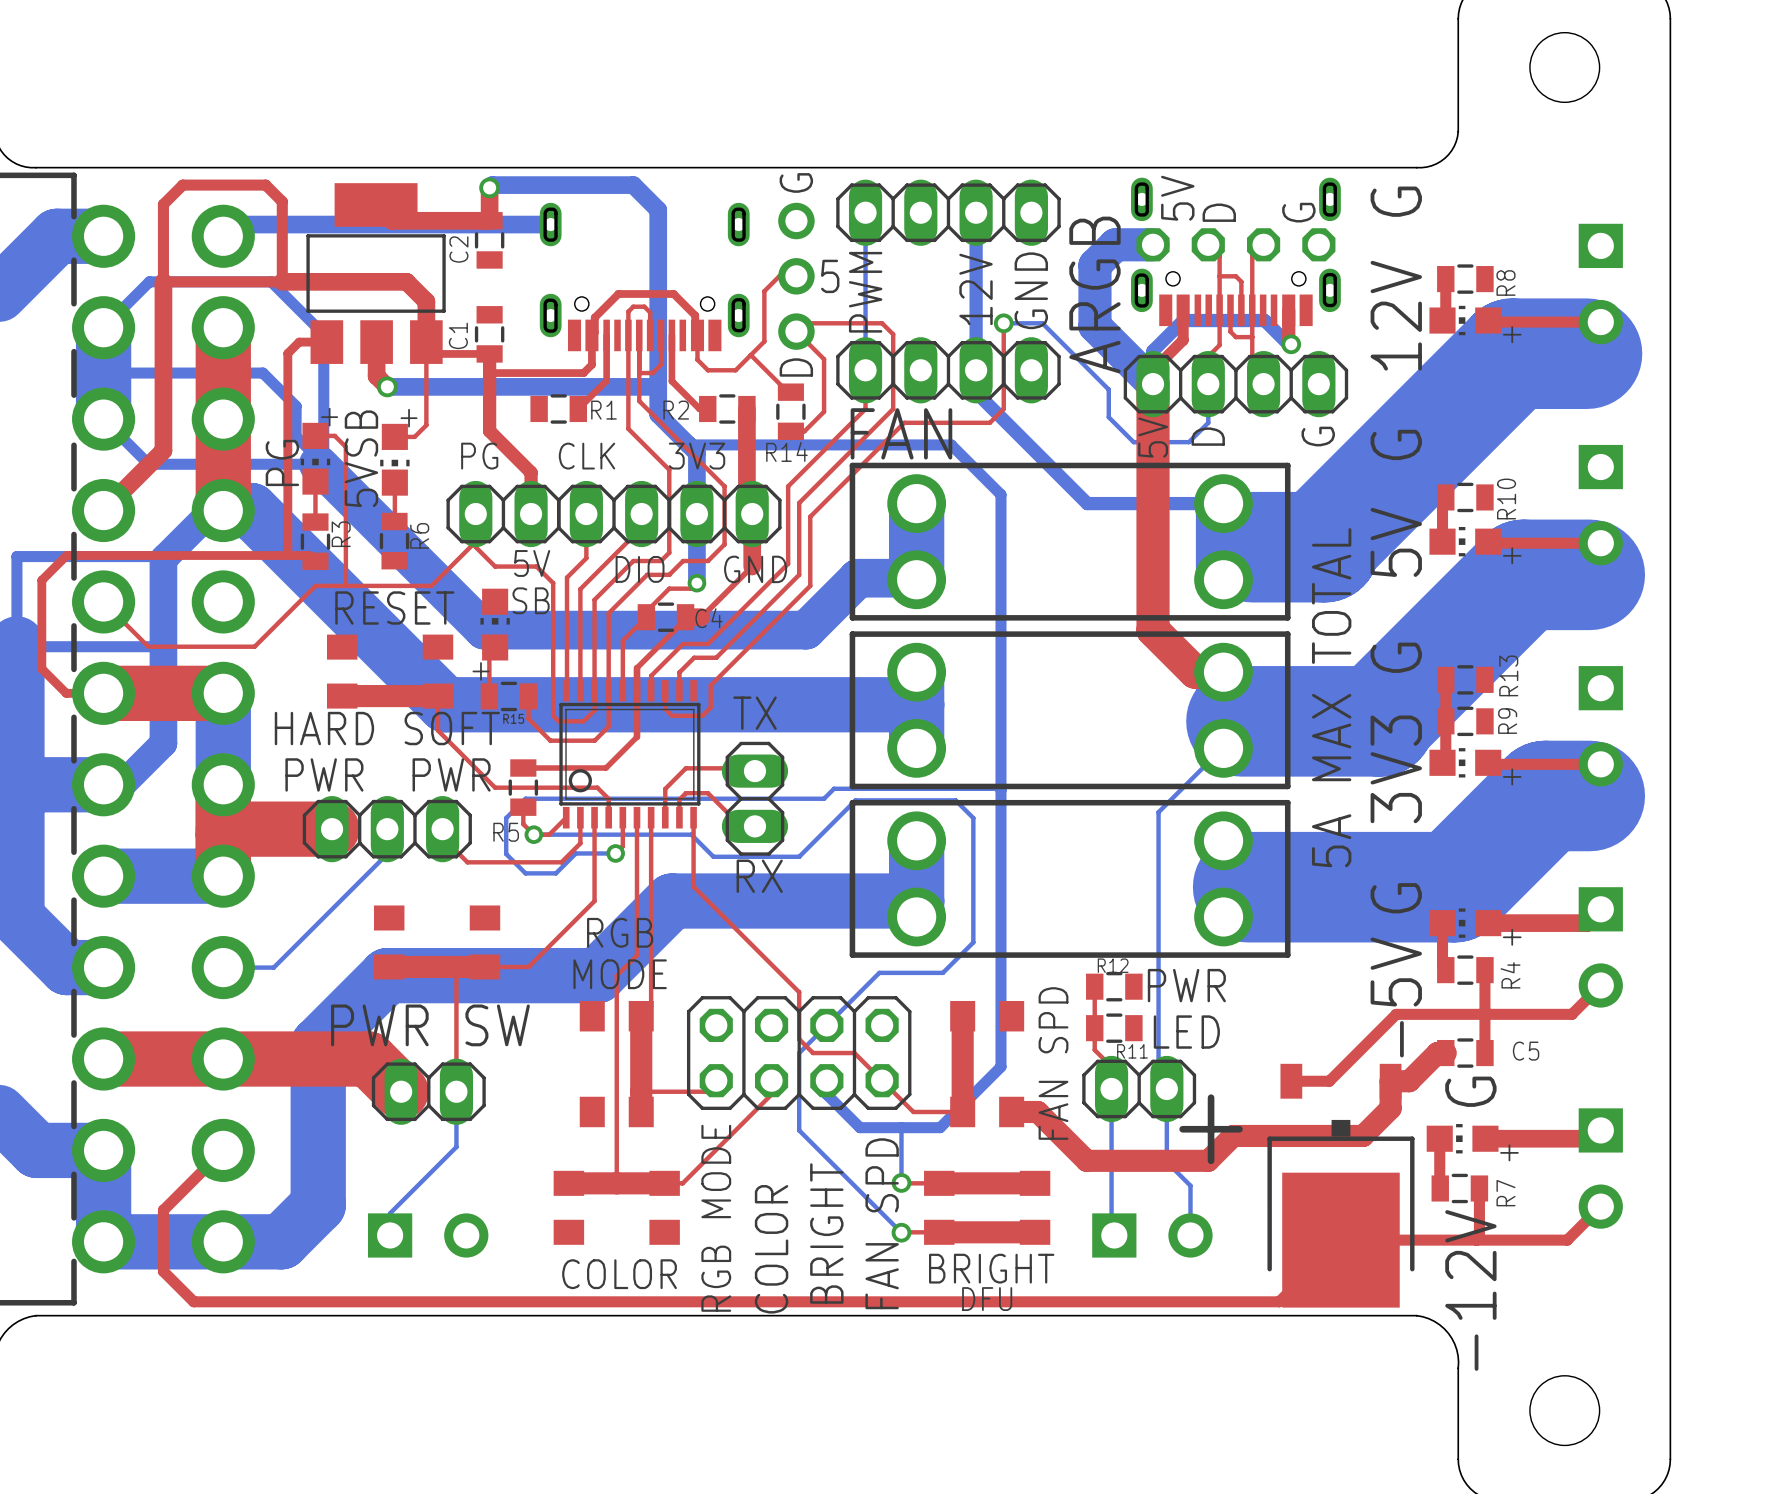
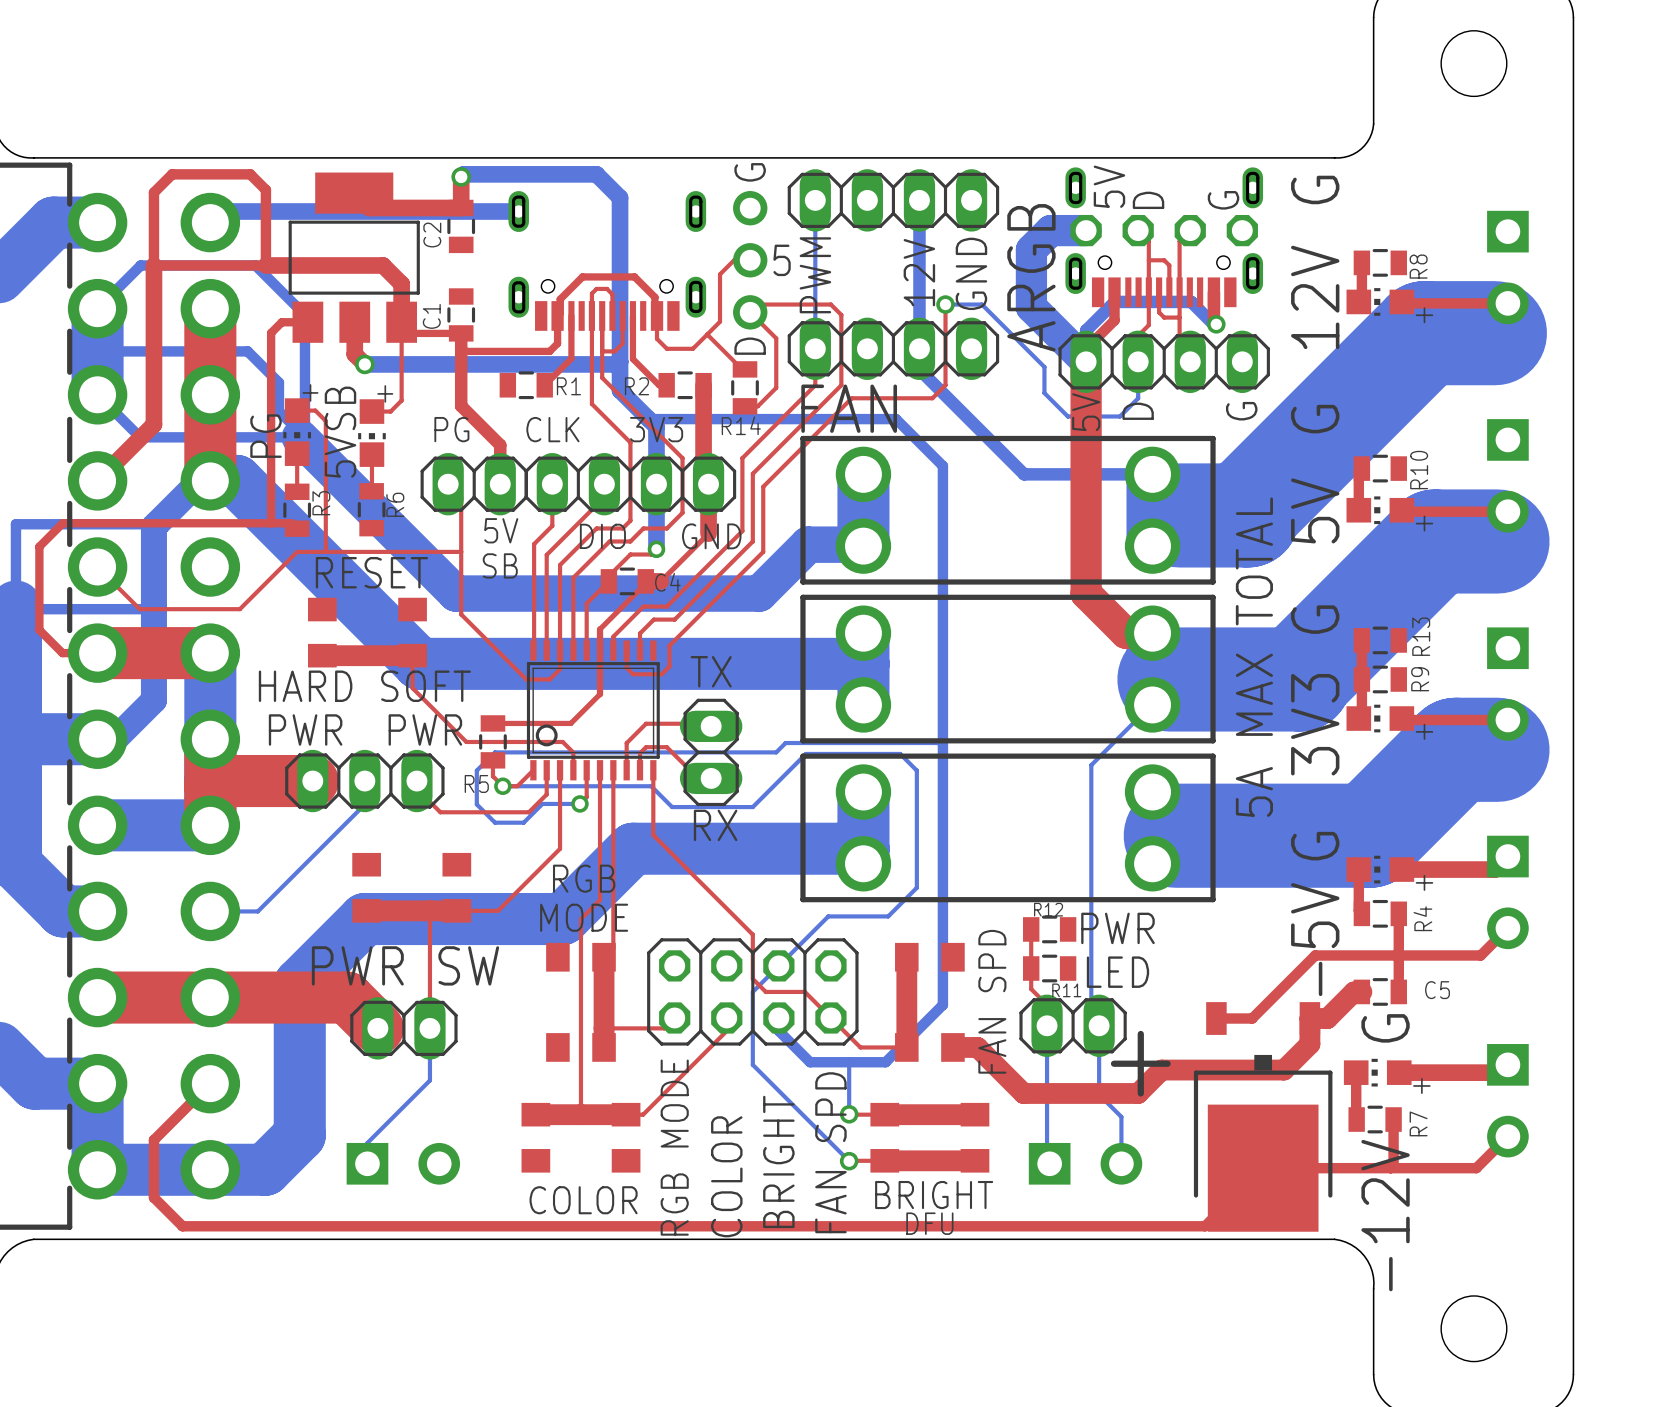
top track: (475, 514) (475, 547) (495, 566) (536, 566) (553, 583) (553, 715) -> (448, 484) (461, 497) (461, 614) (521, 674)
top track: (475, 541) (431, 585) -> (461, 551) (406, 551)
part: (495, 624) -> none
top track: (495, 647) (489, 653) (489, 696) -> none
top track: (608, 690) (608, 726) (594, 740) (550, 740) (528, 718) (528, 696) -> none
R15: (508, 696) -> none

